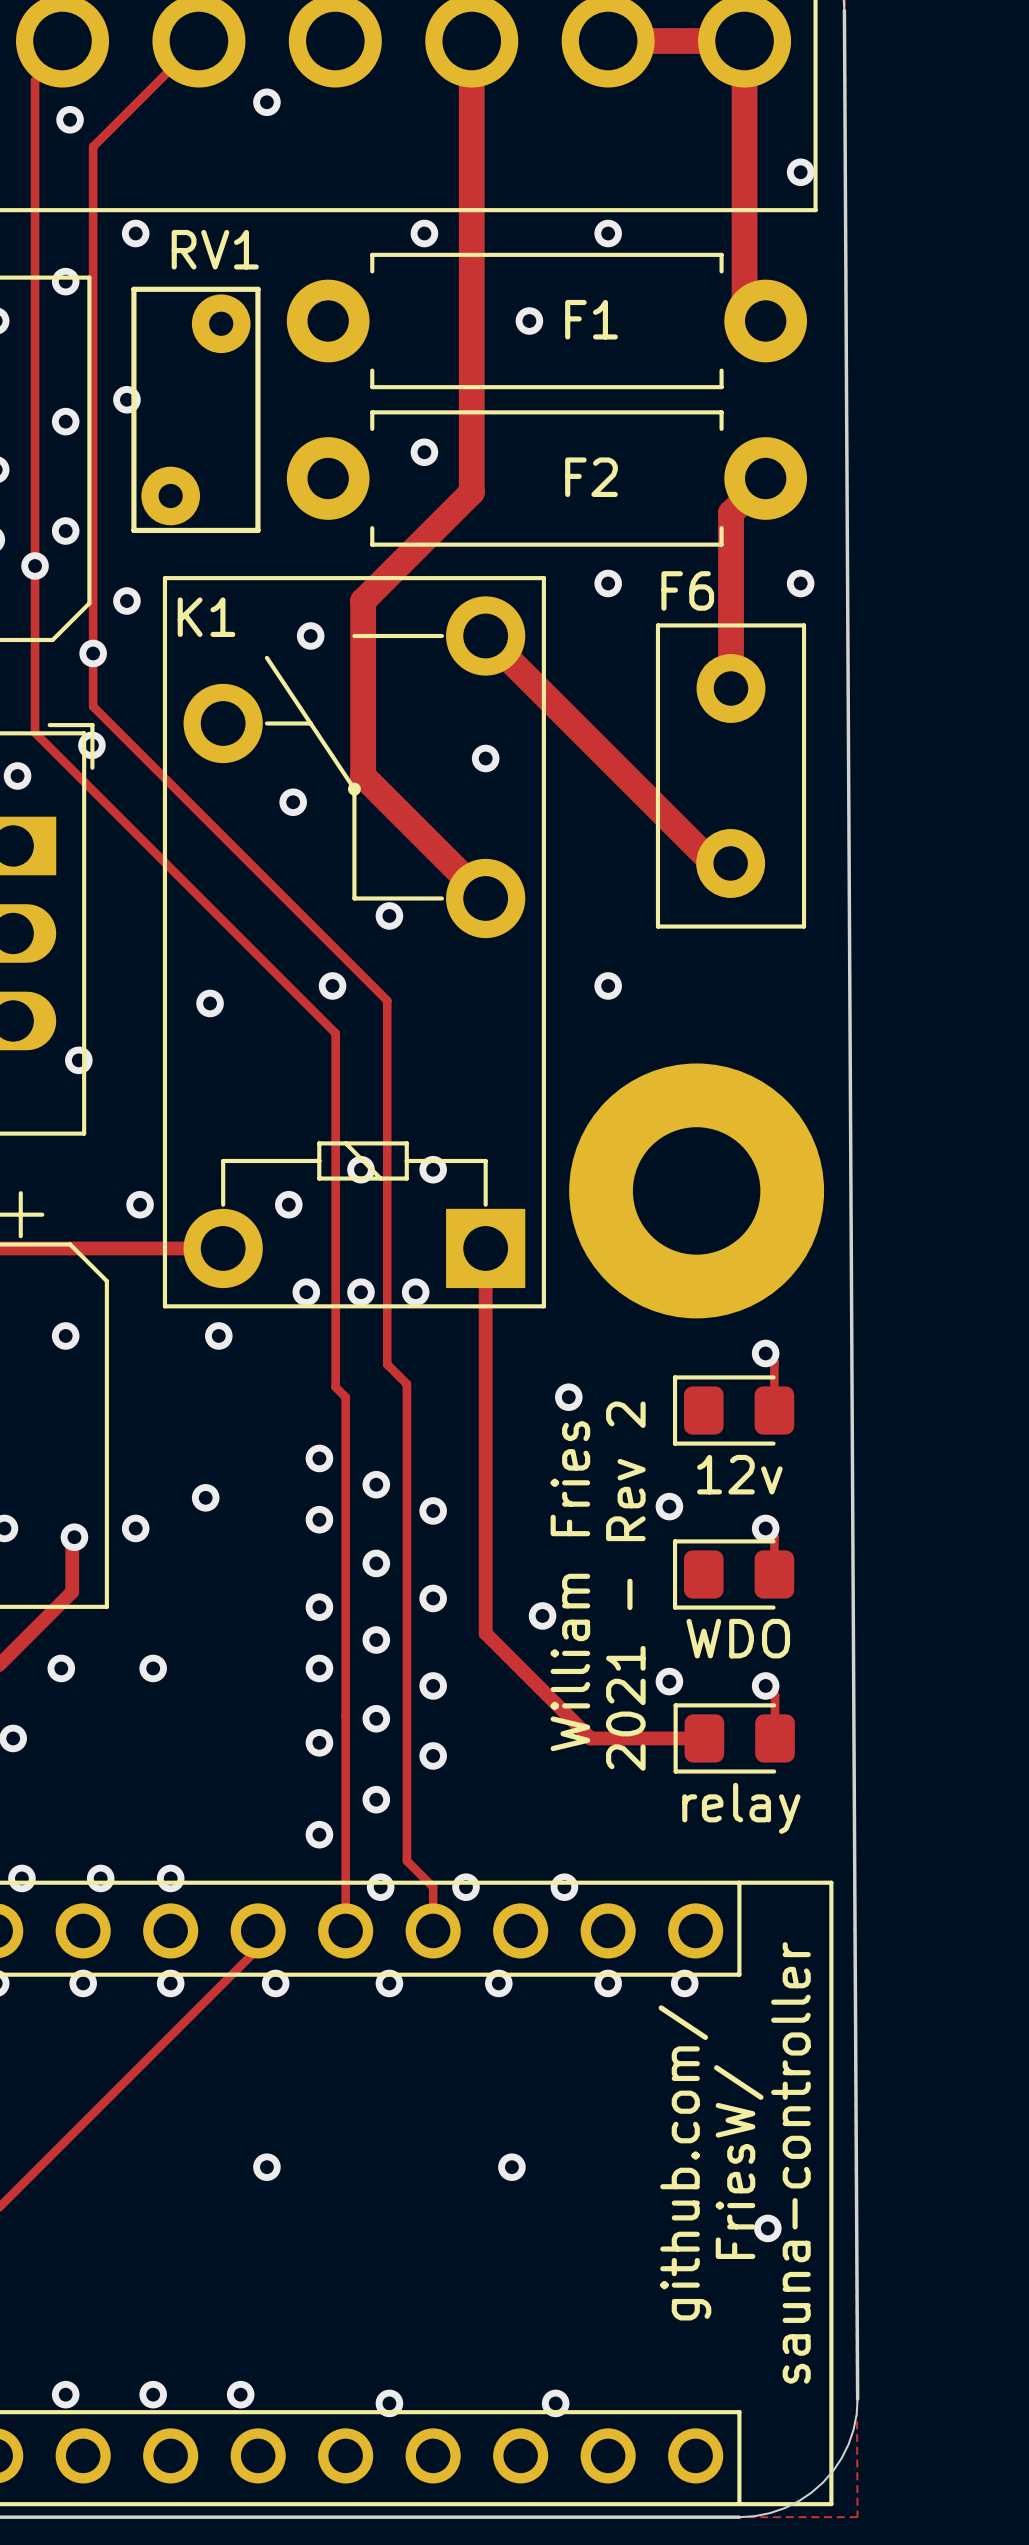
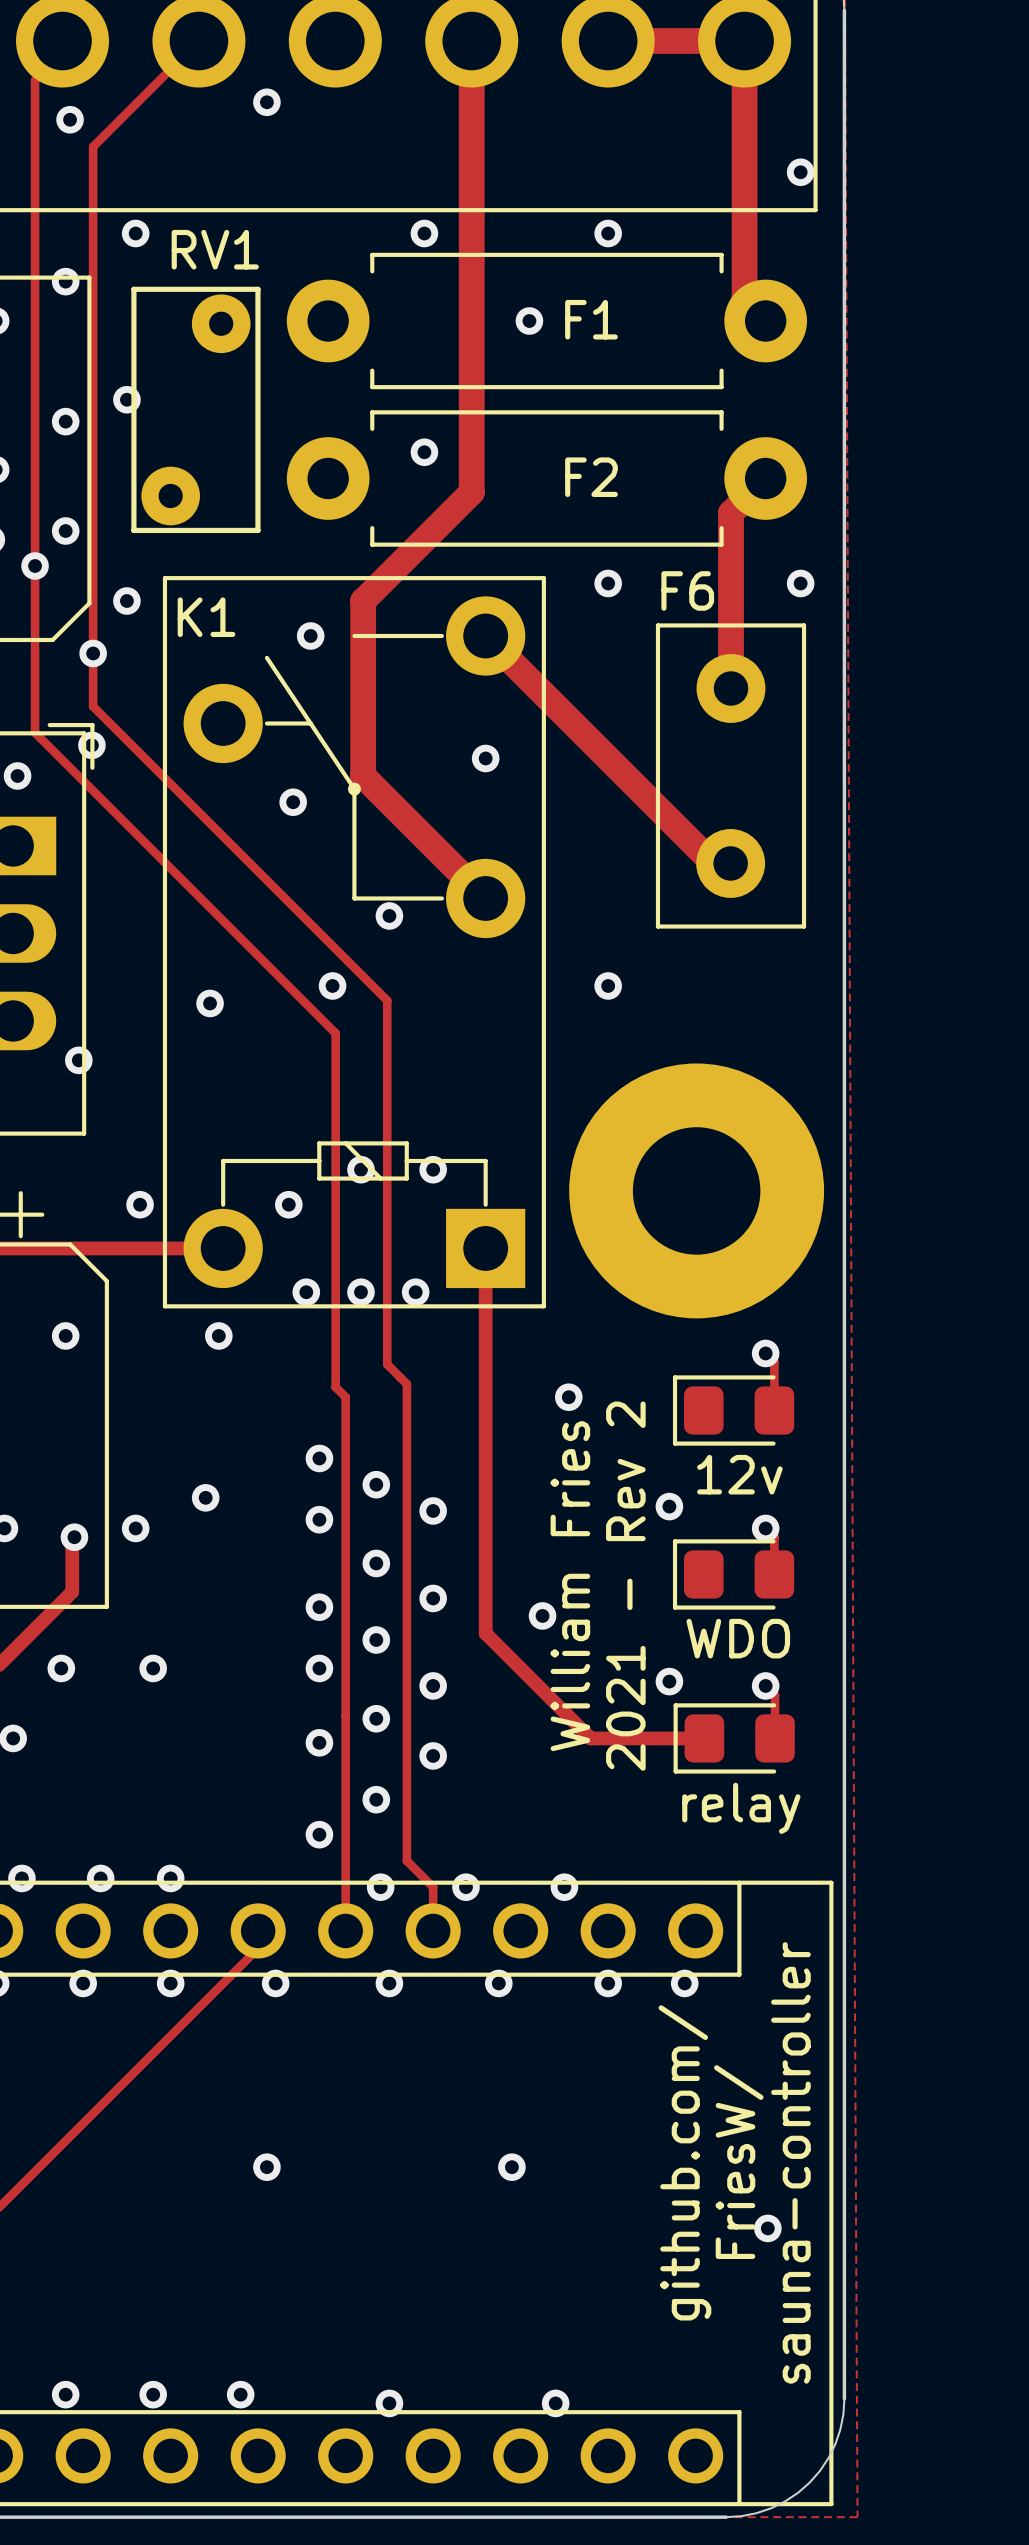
board edge: (844, 10) (857, 2398) (856, 2414) (848, 2444) (841, 2458) (823, 2482) (811, 2492) (784, 2508) (754, 2516) (726, 2517) -> (844, 10) (844, 2398) (843, 2414) (835, 2444) (828, 2458) (809, 2482) (798, 2492) (771, 2508) (756, 2513) (726, 2517)

